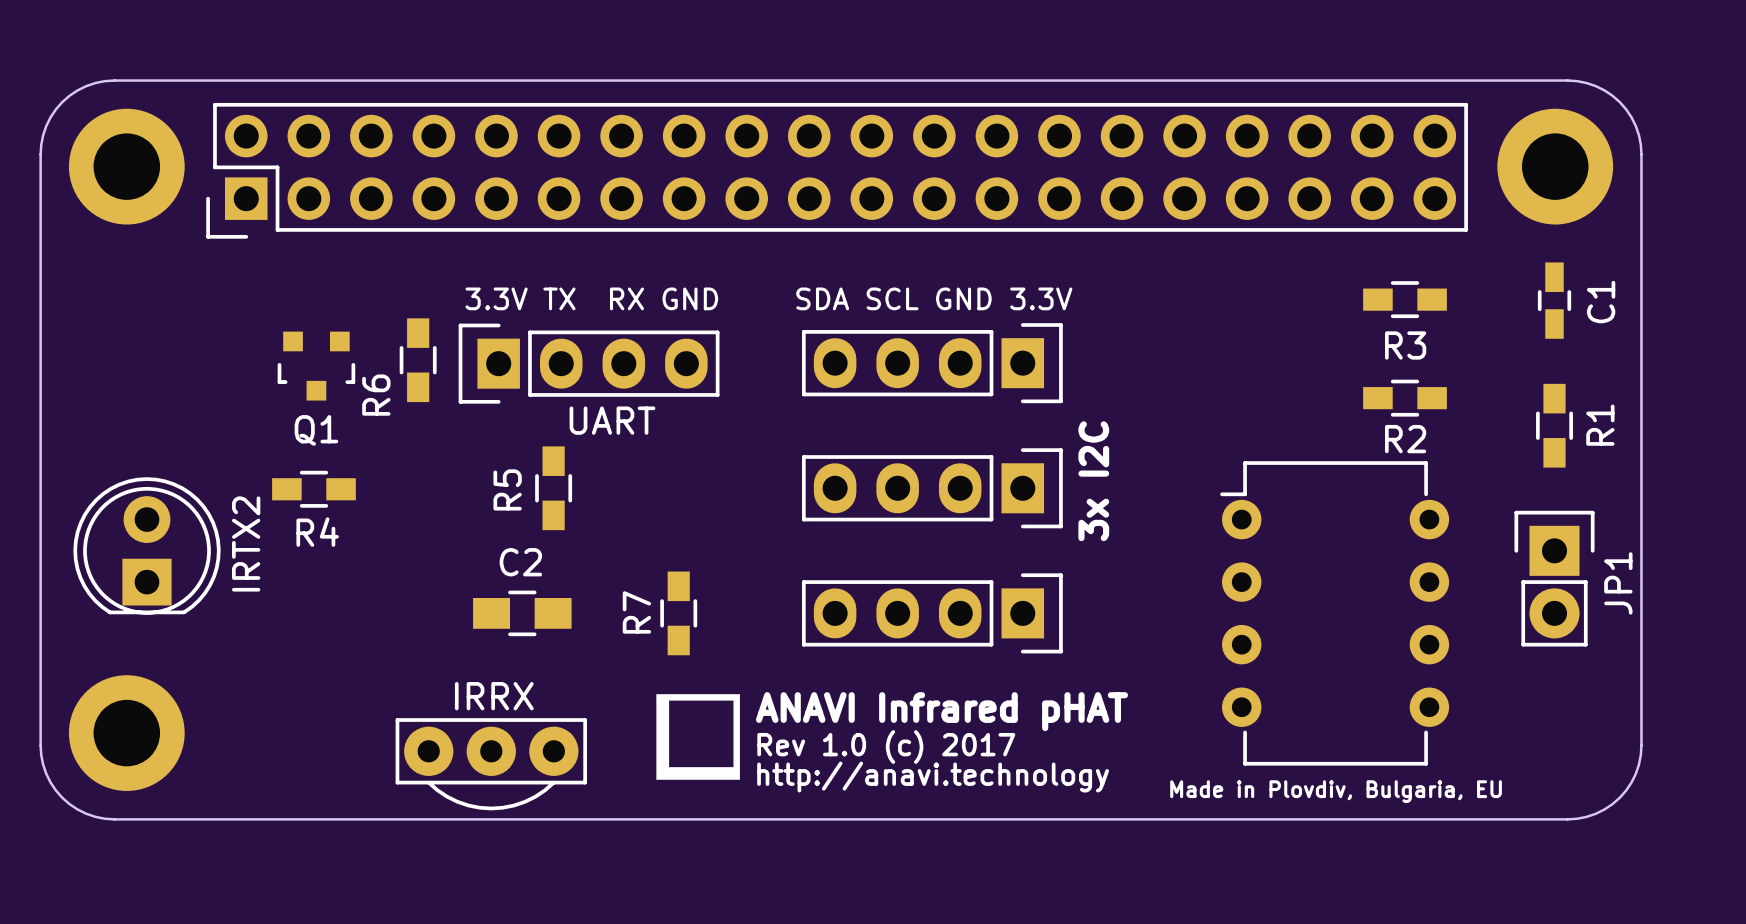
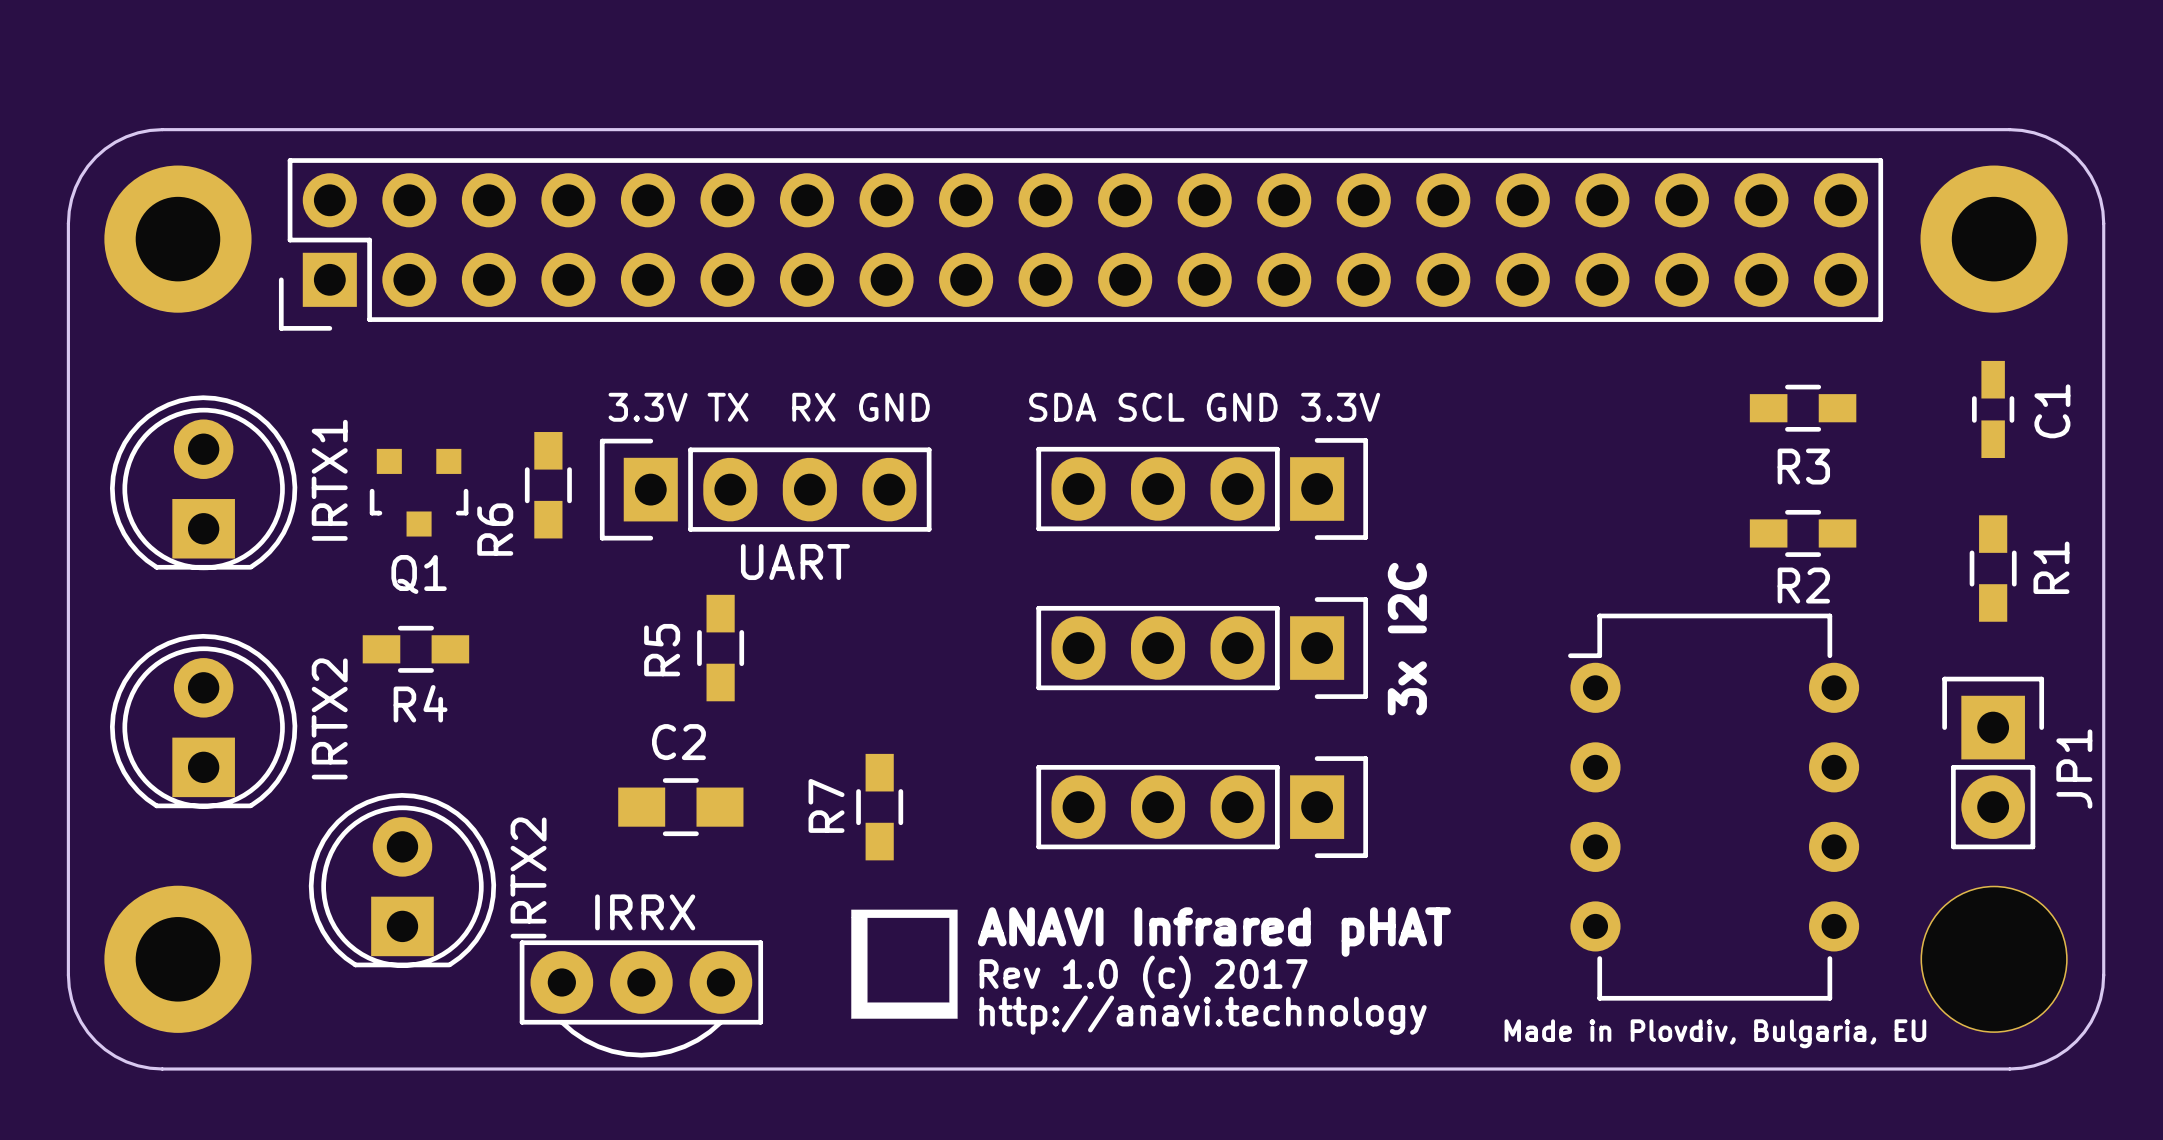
IRTX1: none -> (203, 482)
IRTX2: none -> (402, 880)
part: none -> (1994, 959)

